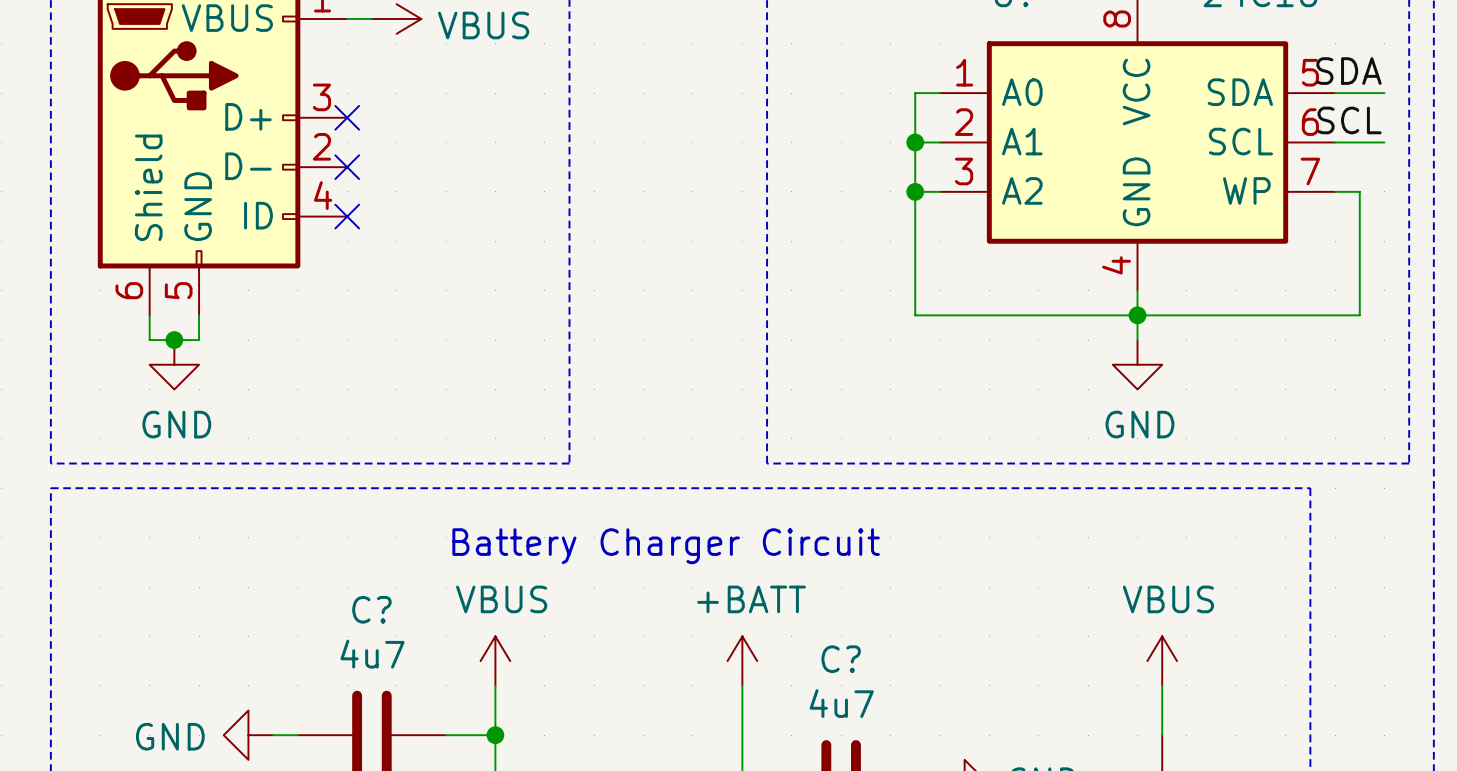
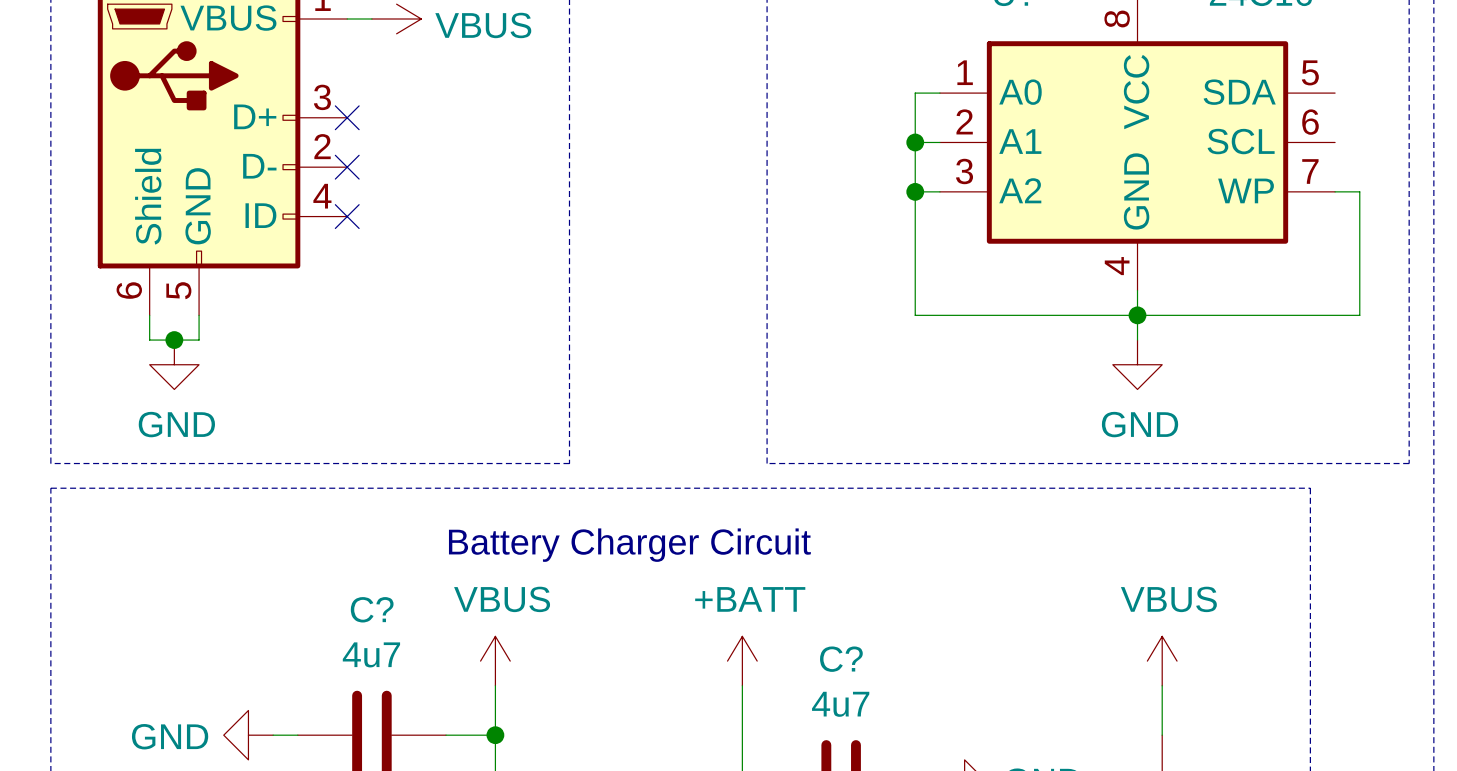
label: SDA (1349, 71) -> none
wire: (1335, 93) (1384, 93) -> none
label: SCL (1349, 120) -> none
wire: (1335, 142) (1384, 142) -> none

